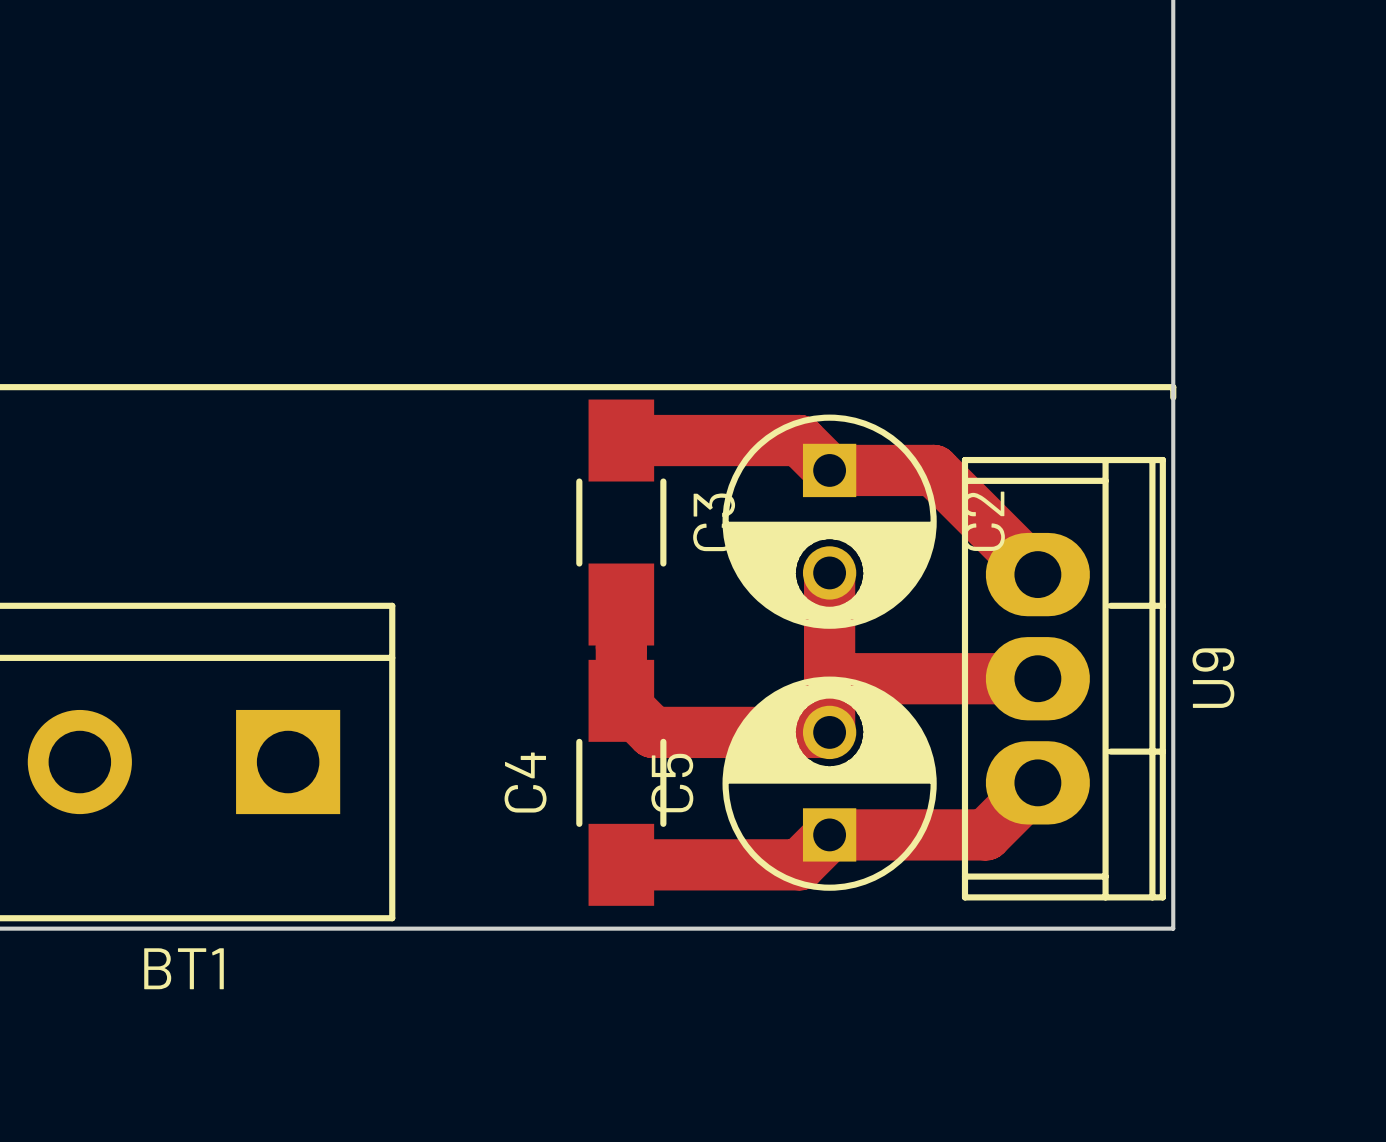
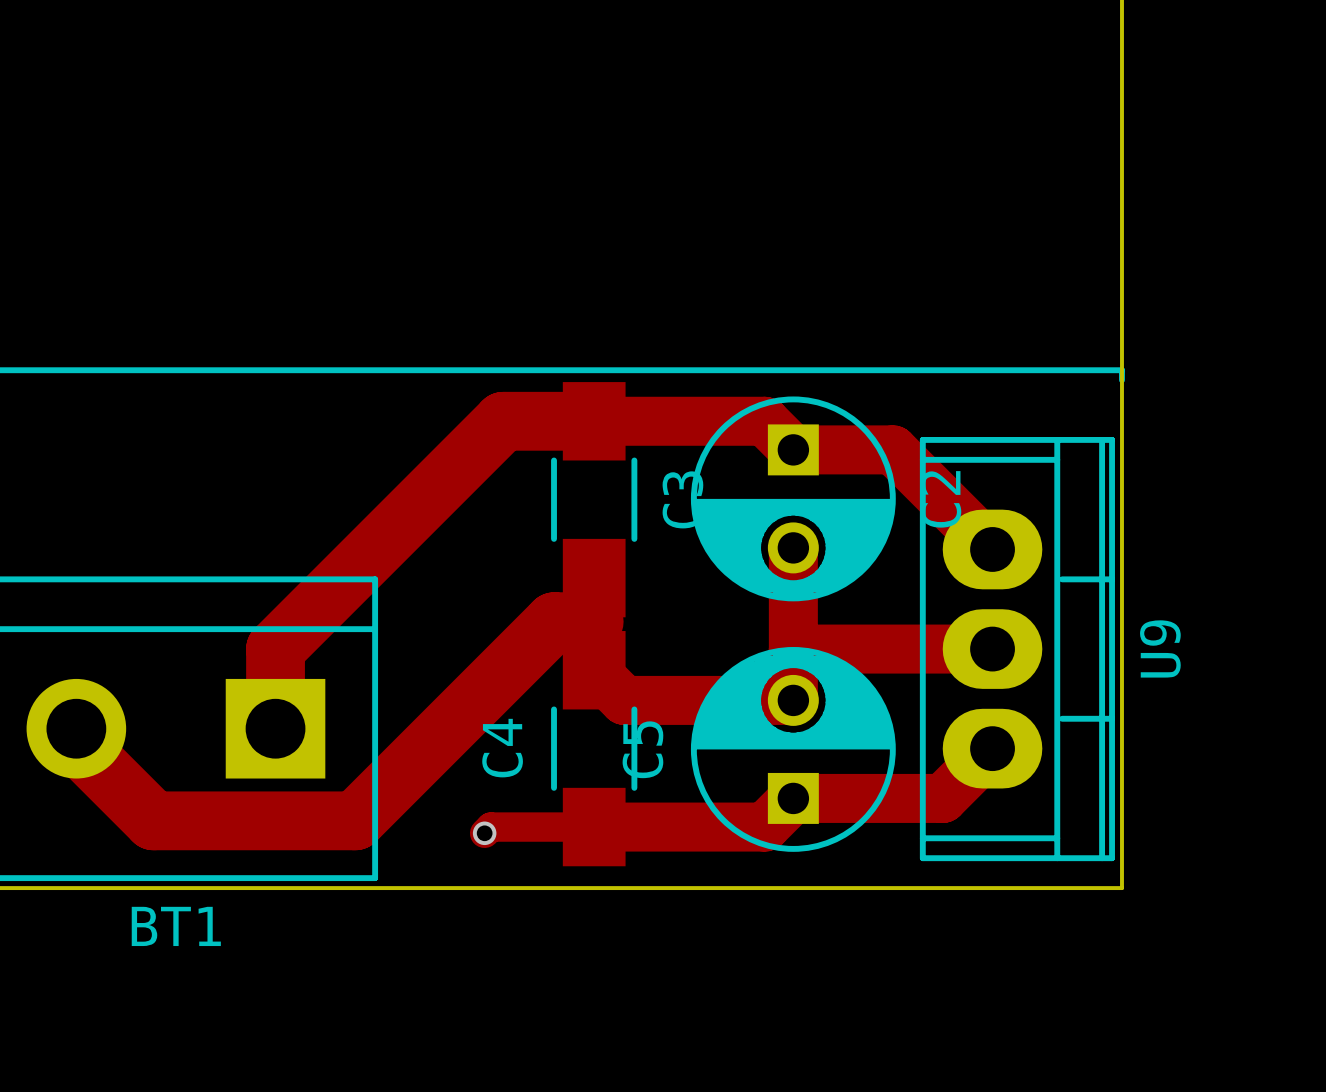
track: none -> (594, 421) (503, 421) (275, 649) (275, 728)
track: none -> (594, 621) (554, 621) (355, 820) (153, 820) (76, 743) (76, 728)
track: none -> (594, 827) (490, 827) (484, 833)
via: none -> (484, 833)

